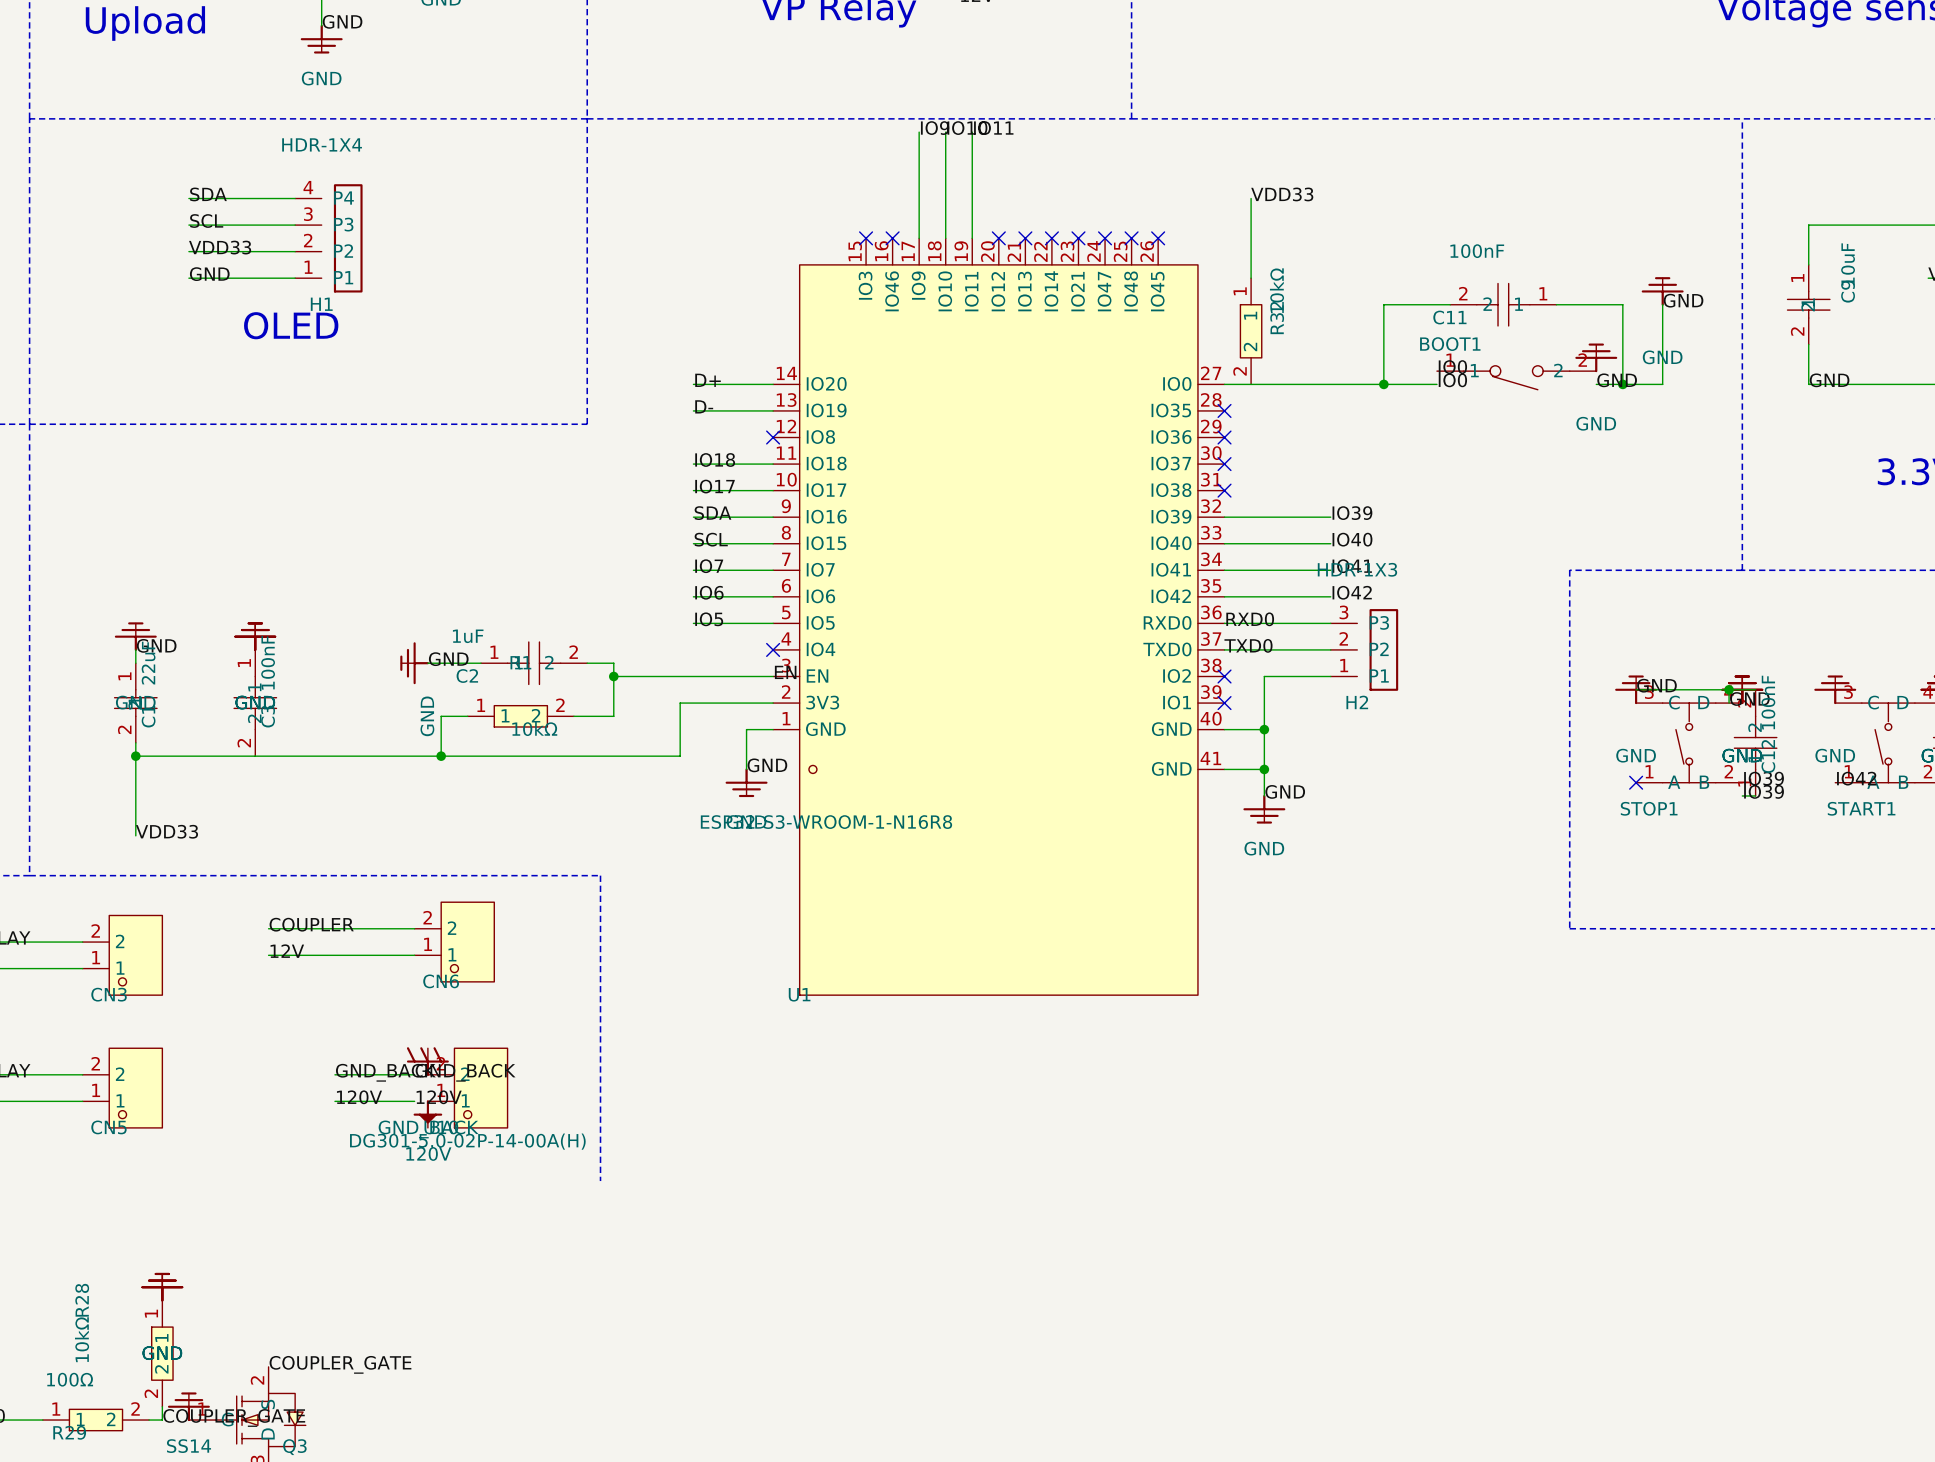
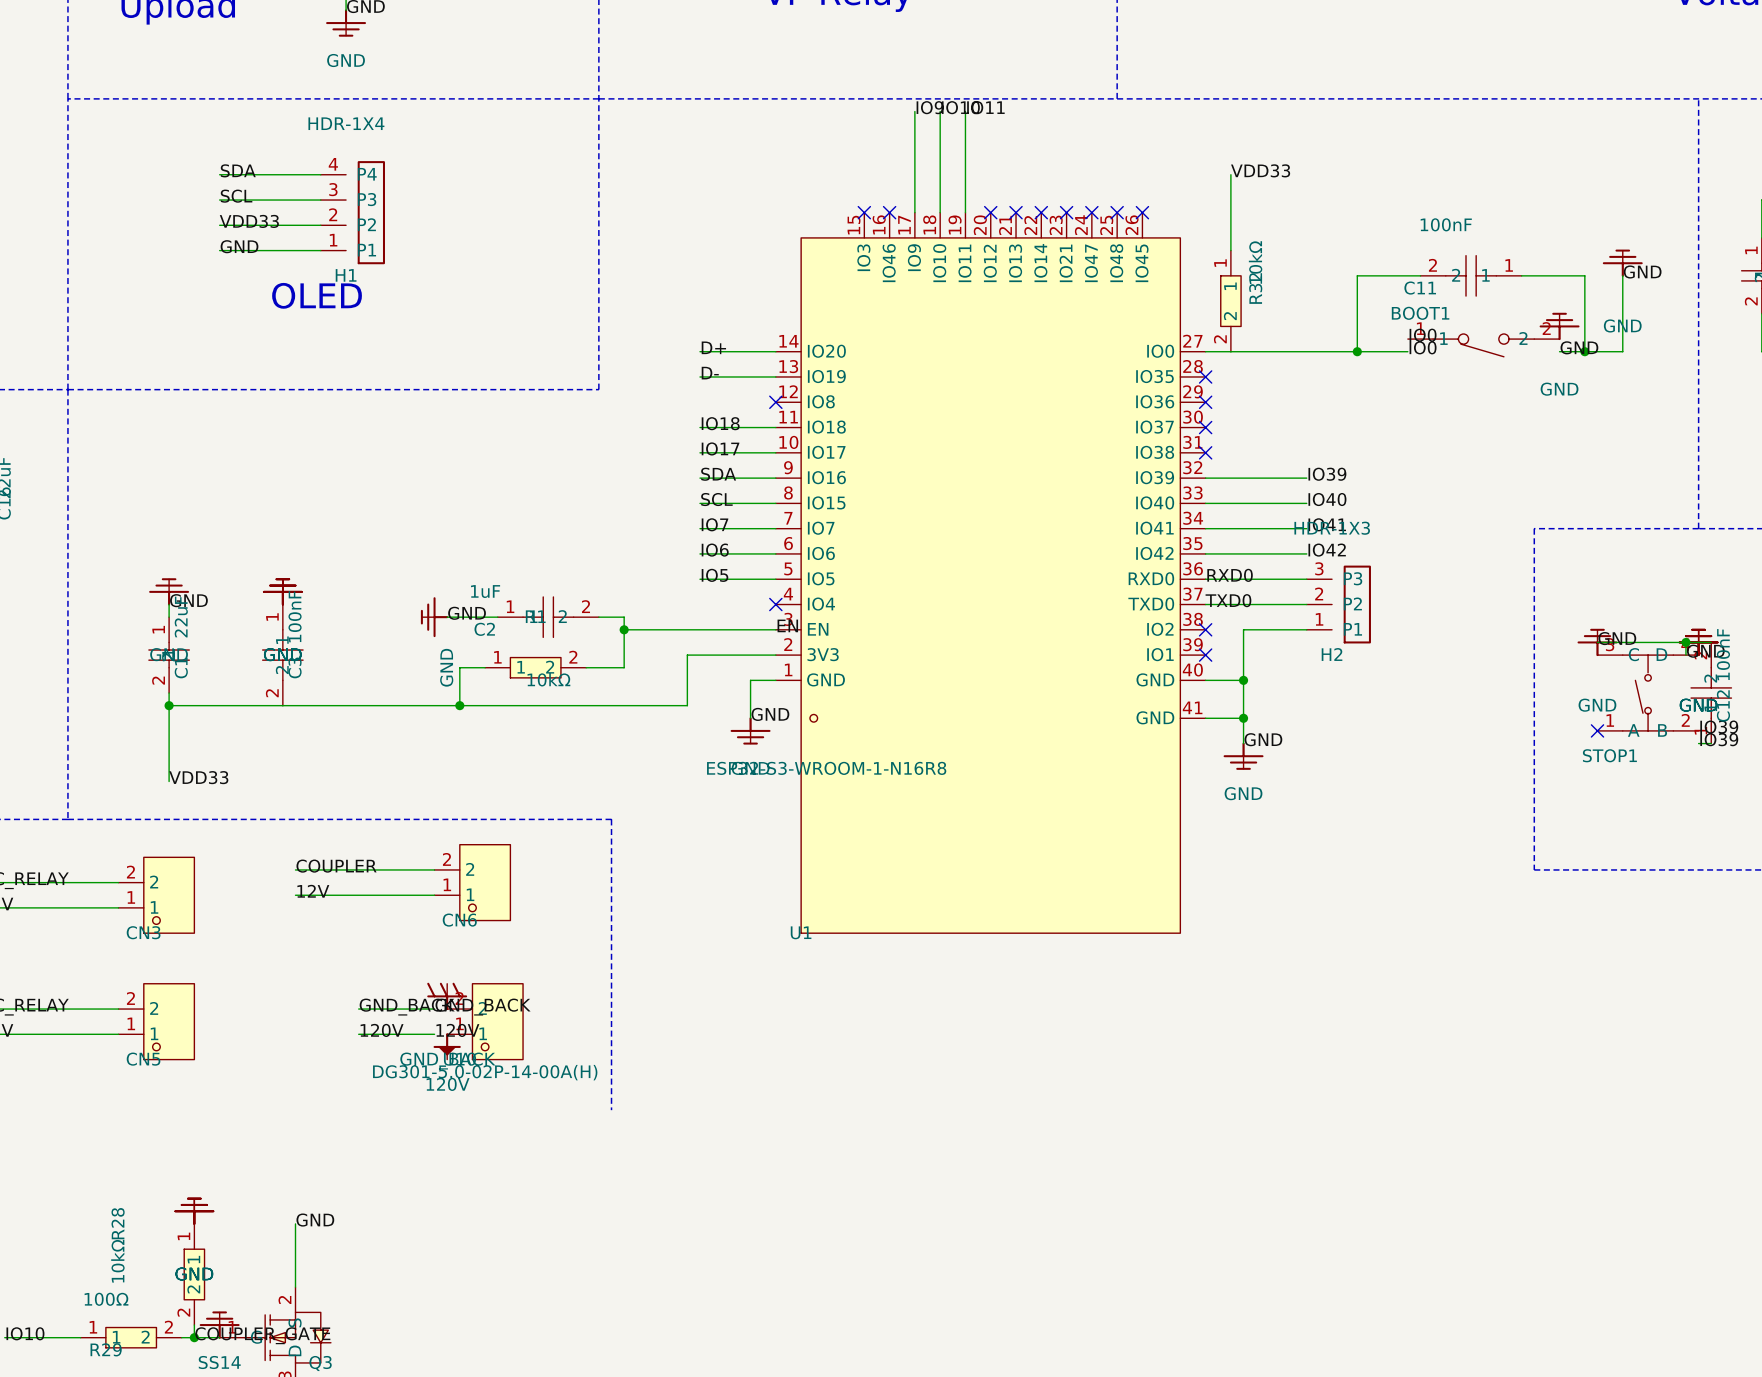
label: none -> GND (315, 1220)
wire: none -> (295, 1223) (295, 1287)
label: COUPLER_GATE (340, 1364) -> none
wire: none -> (194, 1337) (219, 1337)
junction: none -> (194, 1337)

